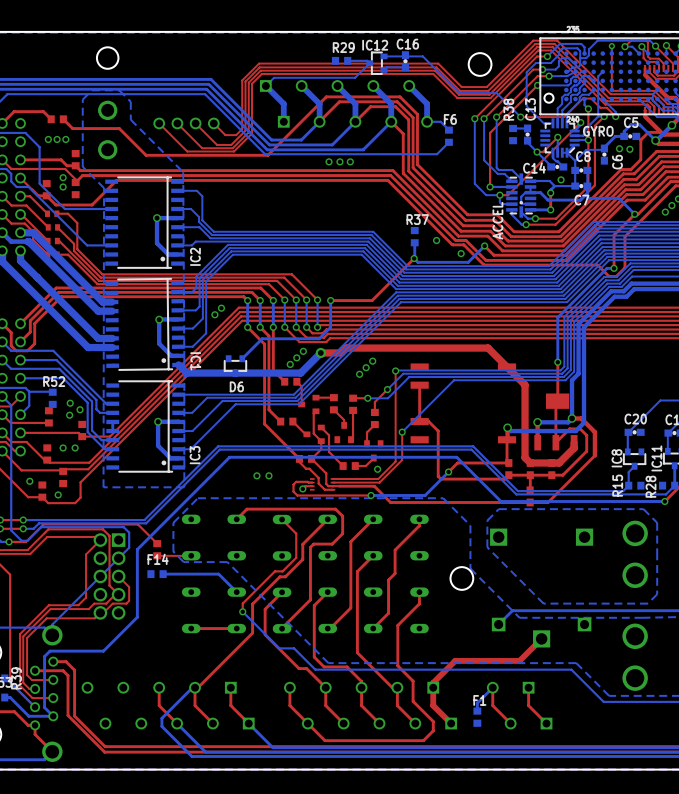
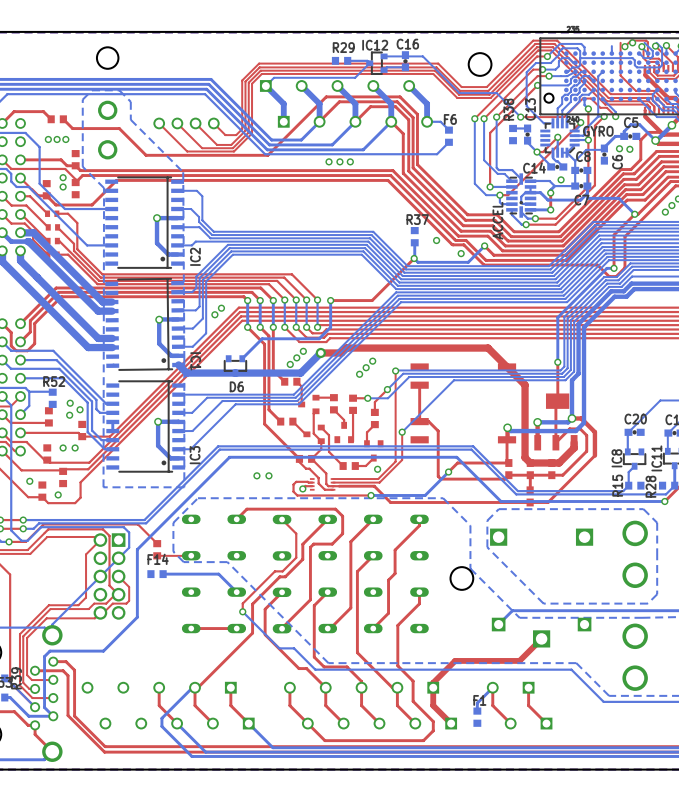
via: none -> (632, 42)
top track: (611, 46) (611, 89) (635, 90) -> (620, 42) (620, 75) (635, 90)
via: (611, 46) -> none
bottom track: (624, 46) (632, 46) (639, 53) -> (644, 42) (652, 51) (652, 56) (644, 58) (639, 53)
bottom track: (655, 46) (650, 40) (597, 40) (588, 49) (588, 55) (586, 58) -> (656, 42) (662, 48) (662, 65) (659, 67) (636, 67) (632, 58) (586, 58)

